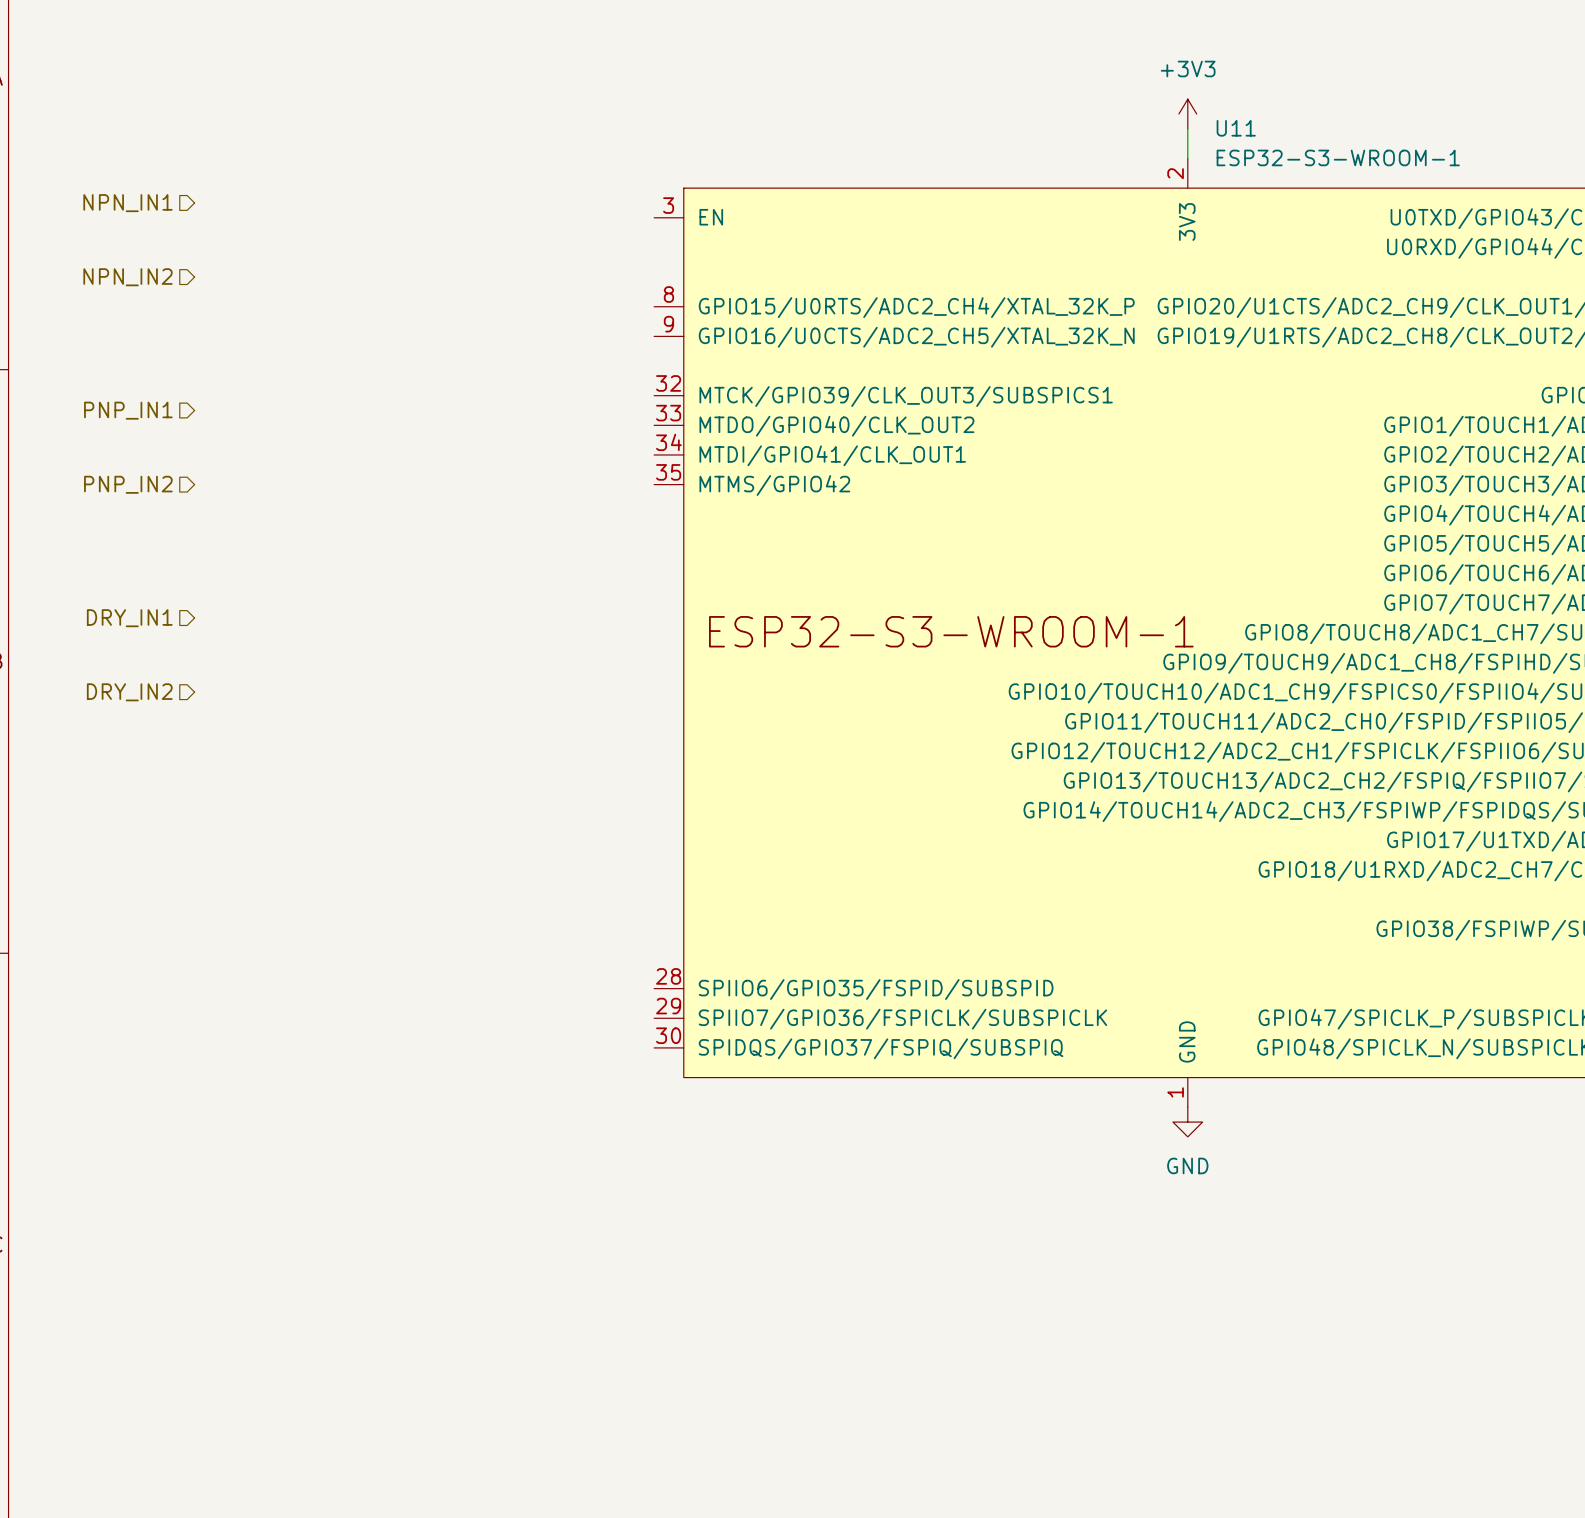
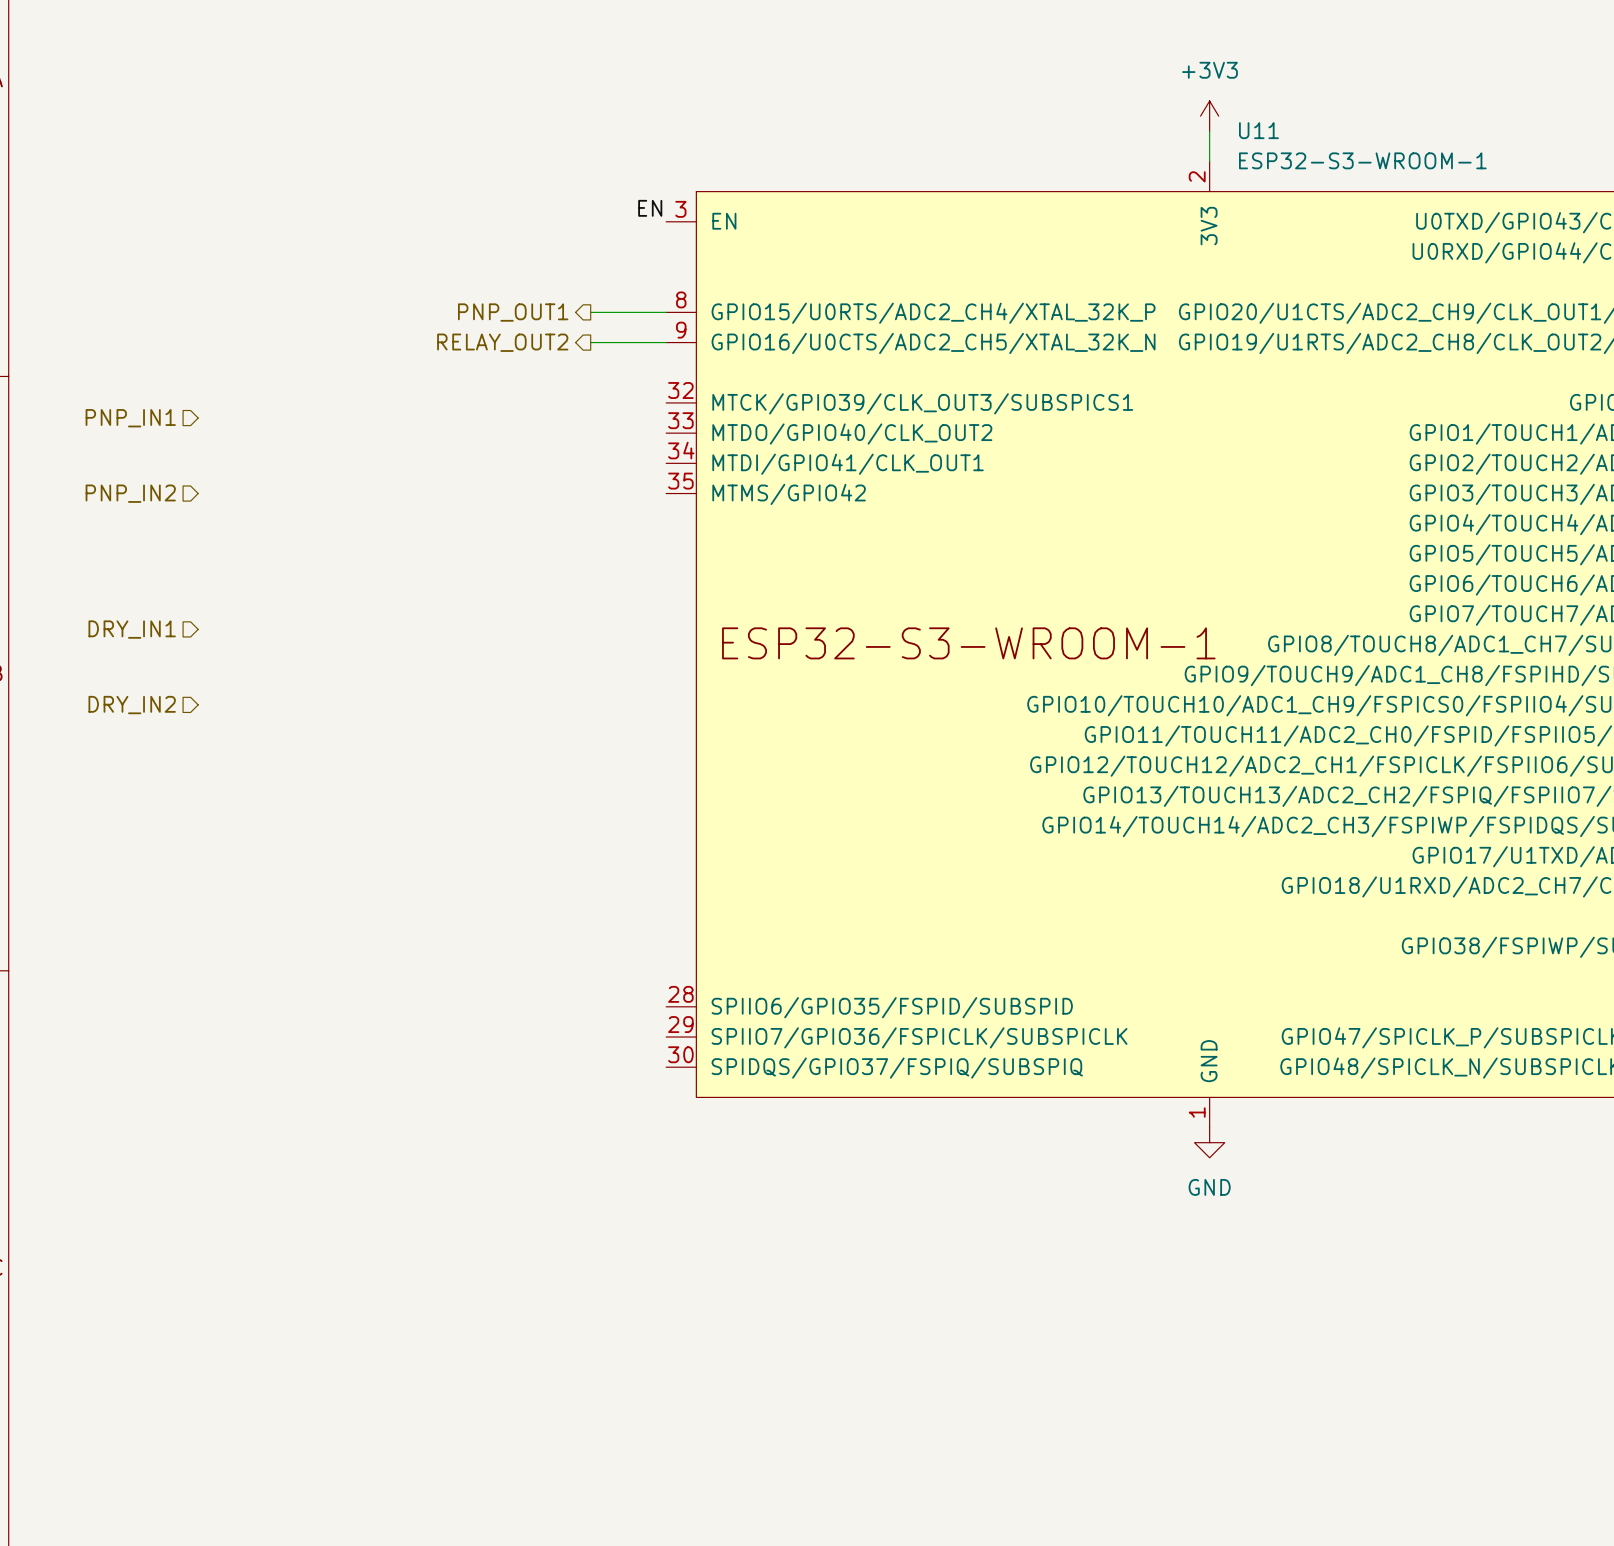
hierarchical label: NPN_IN1 (128, 203) -> none
label: none -> EN (650, 208)
hierarchical label: NPN_IN2 (128, 277) -> none
hierarchical label: none -> PNP_OUT1 (513, 312)
wire: none -> (590, 312) (666, 312)
hierarchical label: none -> RELAY_OUT2 (502, 342)
wire: none -> (590, 342) (666, 342)

